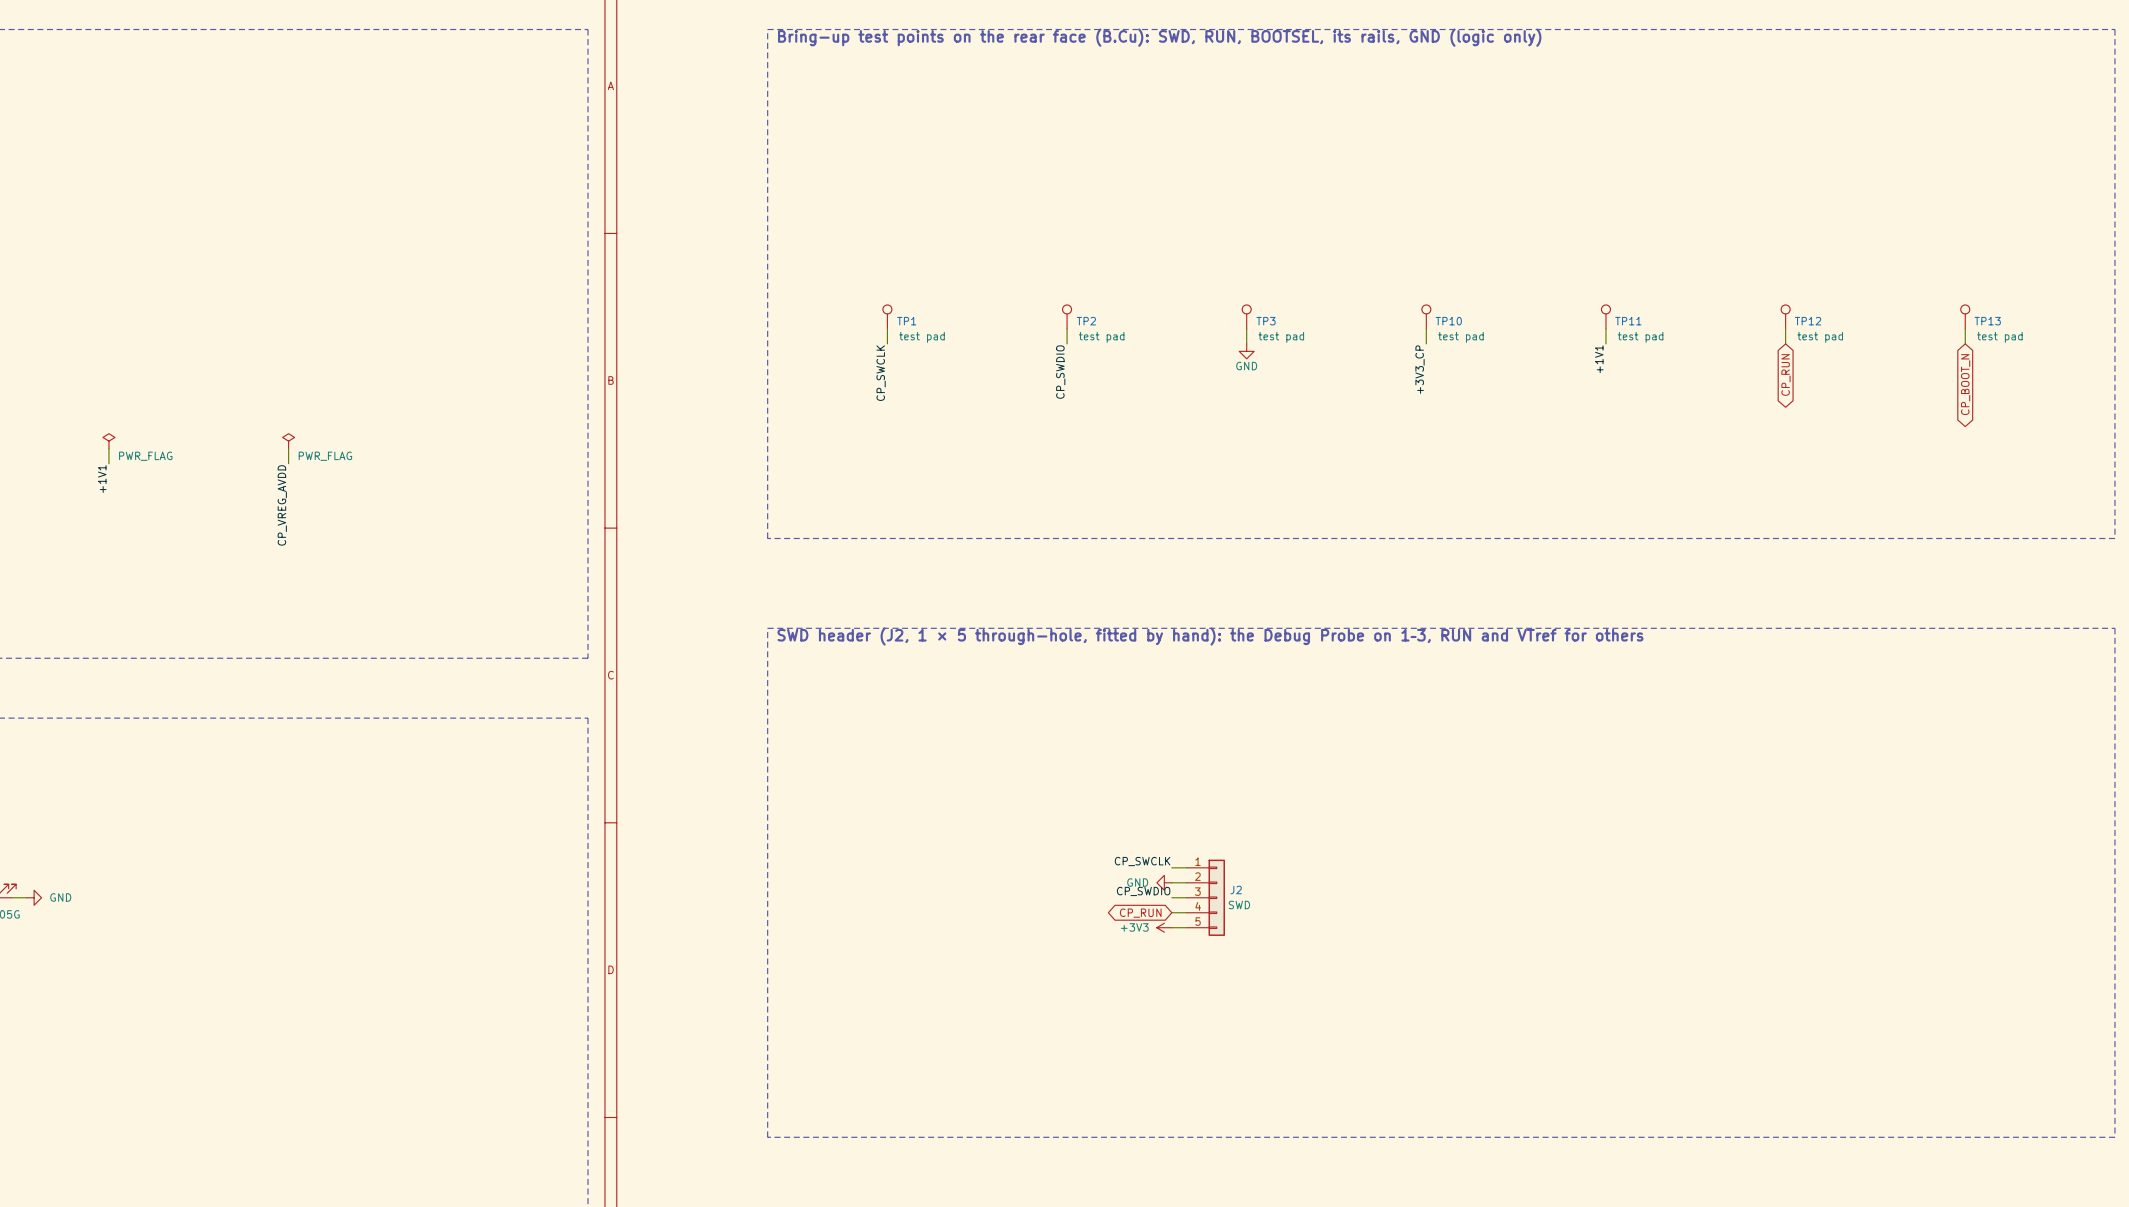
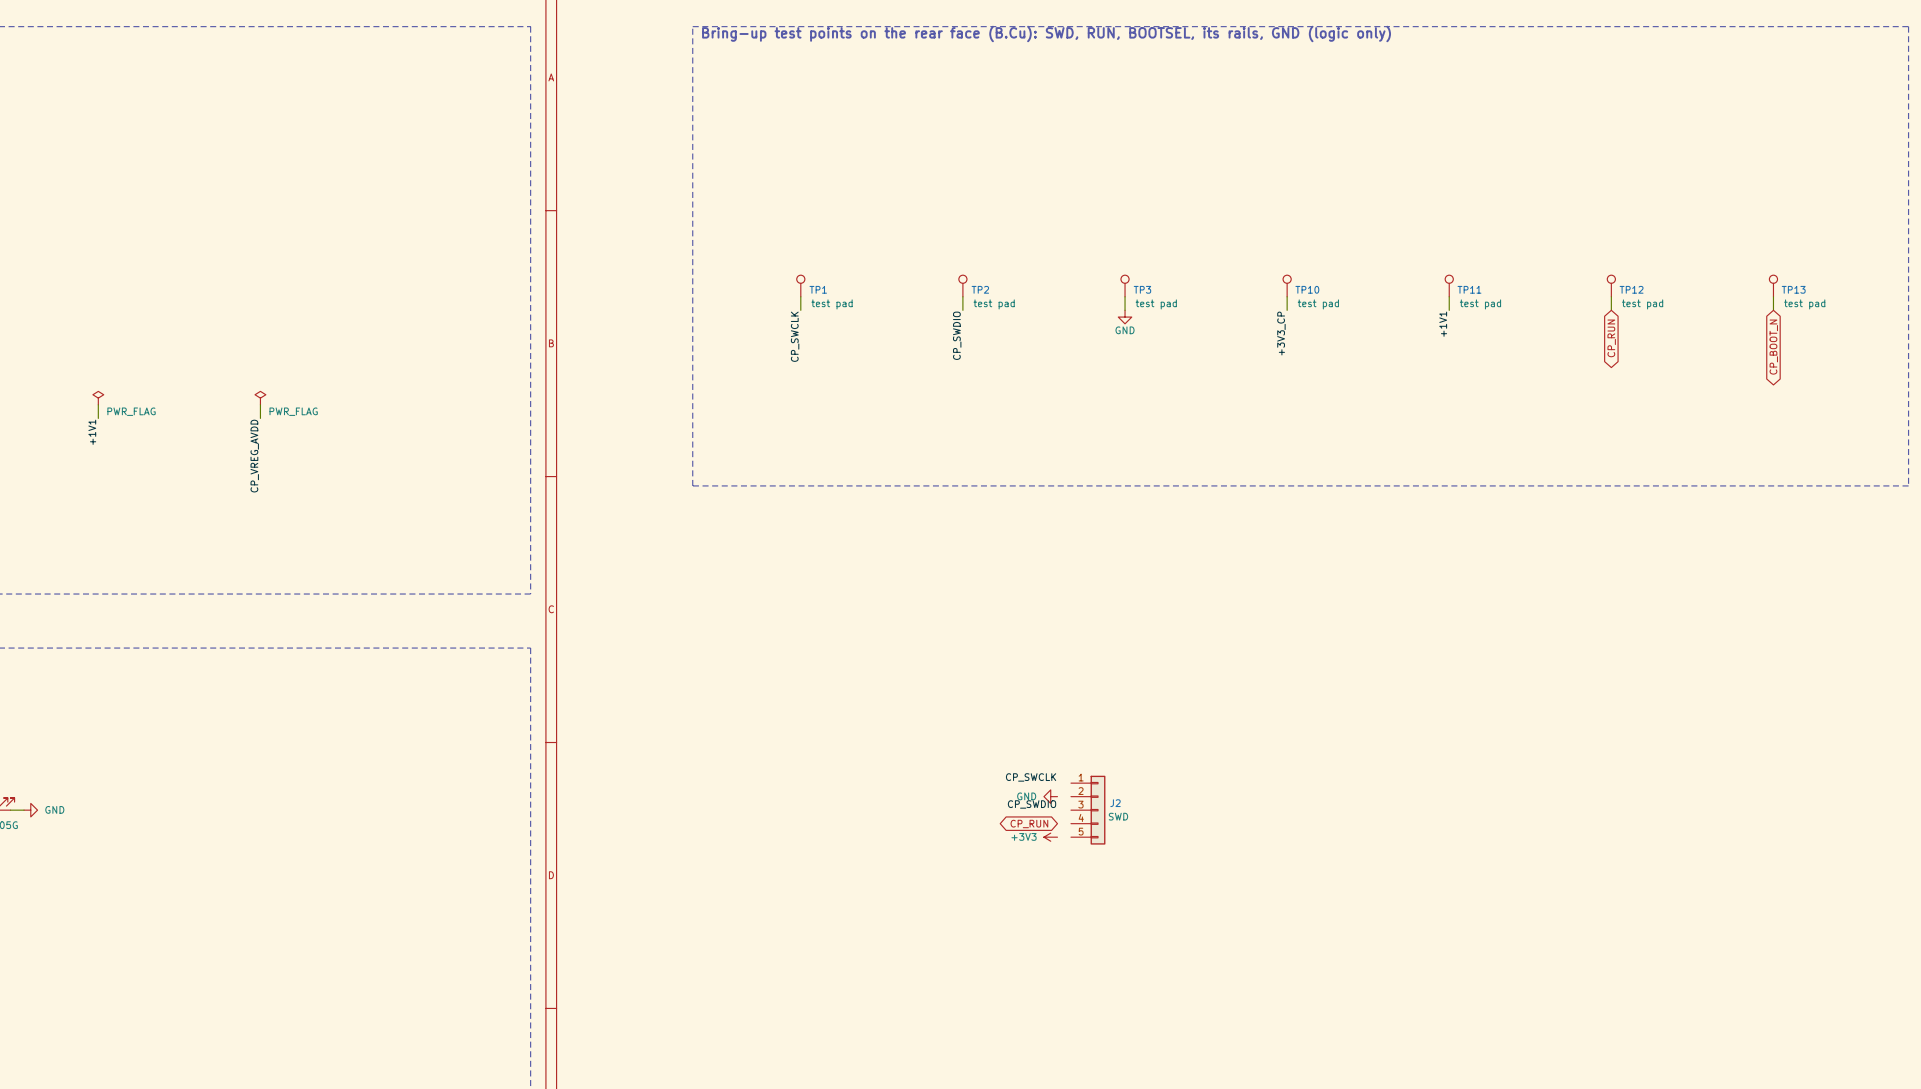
line: (767, 628) (2114, 628) (2114, 1137) (767, 1137) (767, 628) -> none
text: SWD header (J2, 1 × 5 through-hole, fitted by hand): the Debug Probe on 1–3, RUN and VTref for others (1210, 636) -> none
wire: (1171, 867) (1186, 867) -> none
wire: (1171, 882) (1186, 882) -> none
wire: (1171, 897) (1186, 897) -> none
wire: (1171, 912) (1186, 912) -> none
wire: (1171, 927) (1186, 927) -> none

